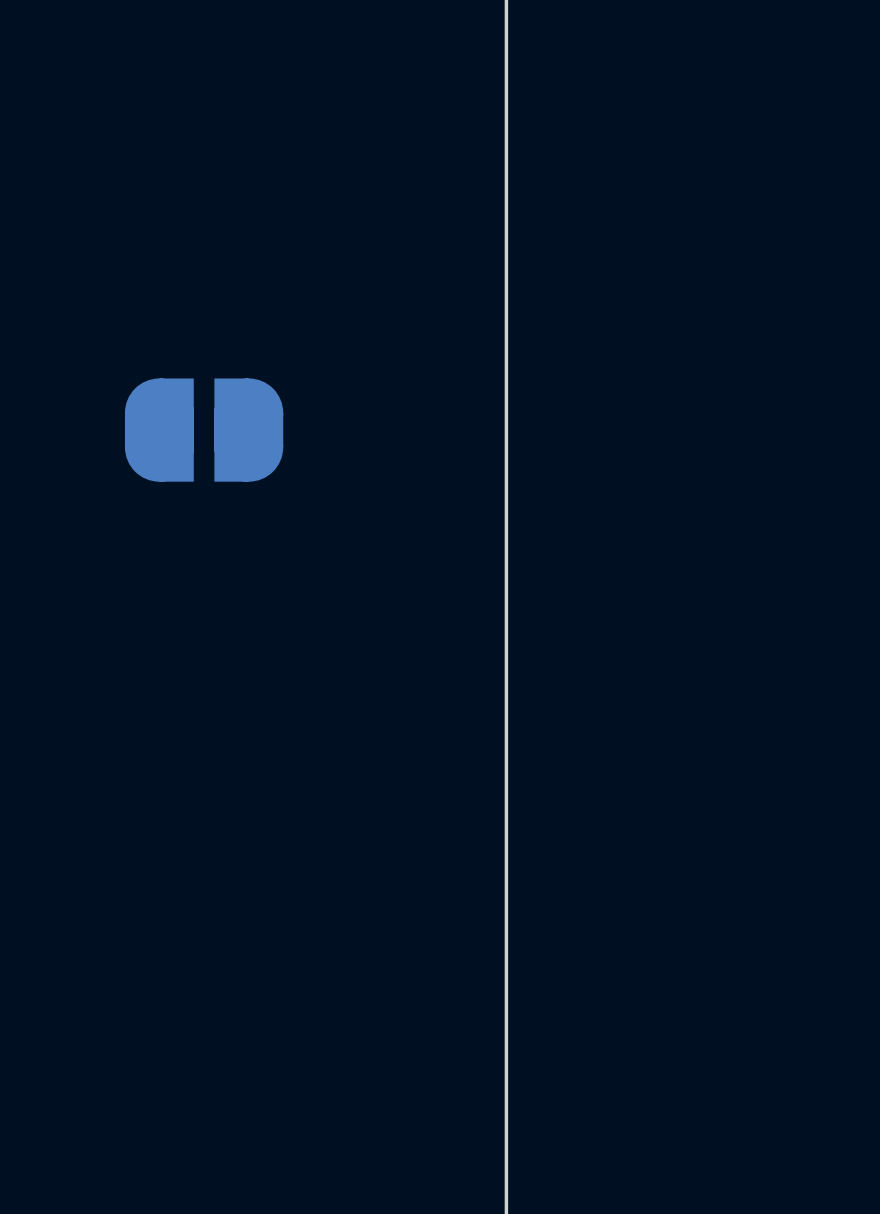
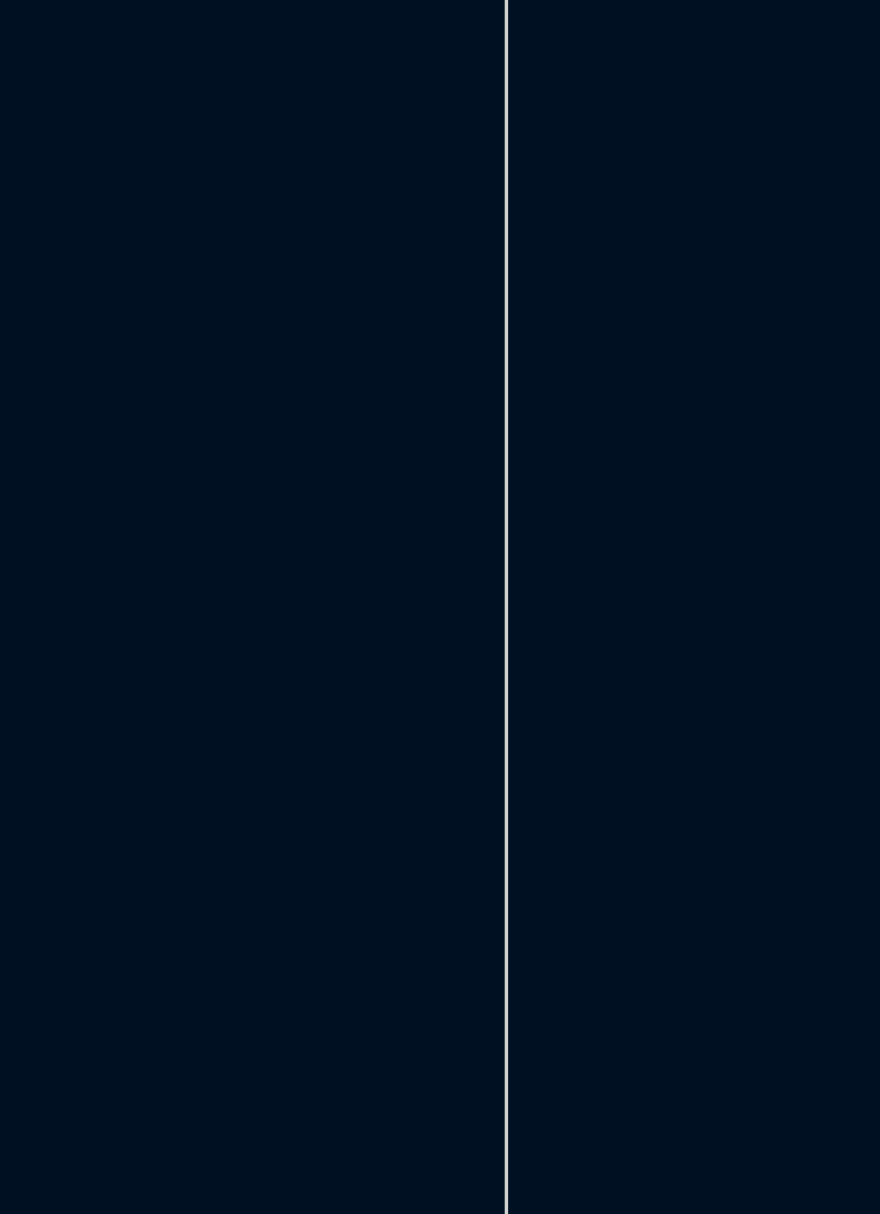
part: (204, 430) -> none

